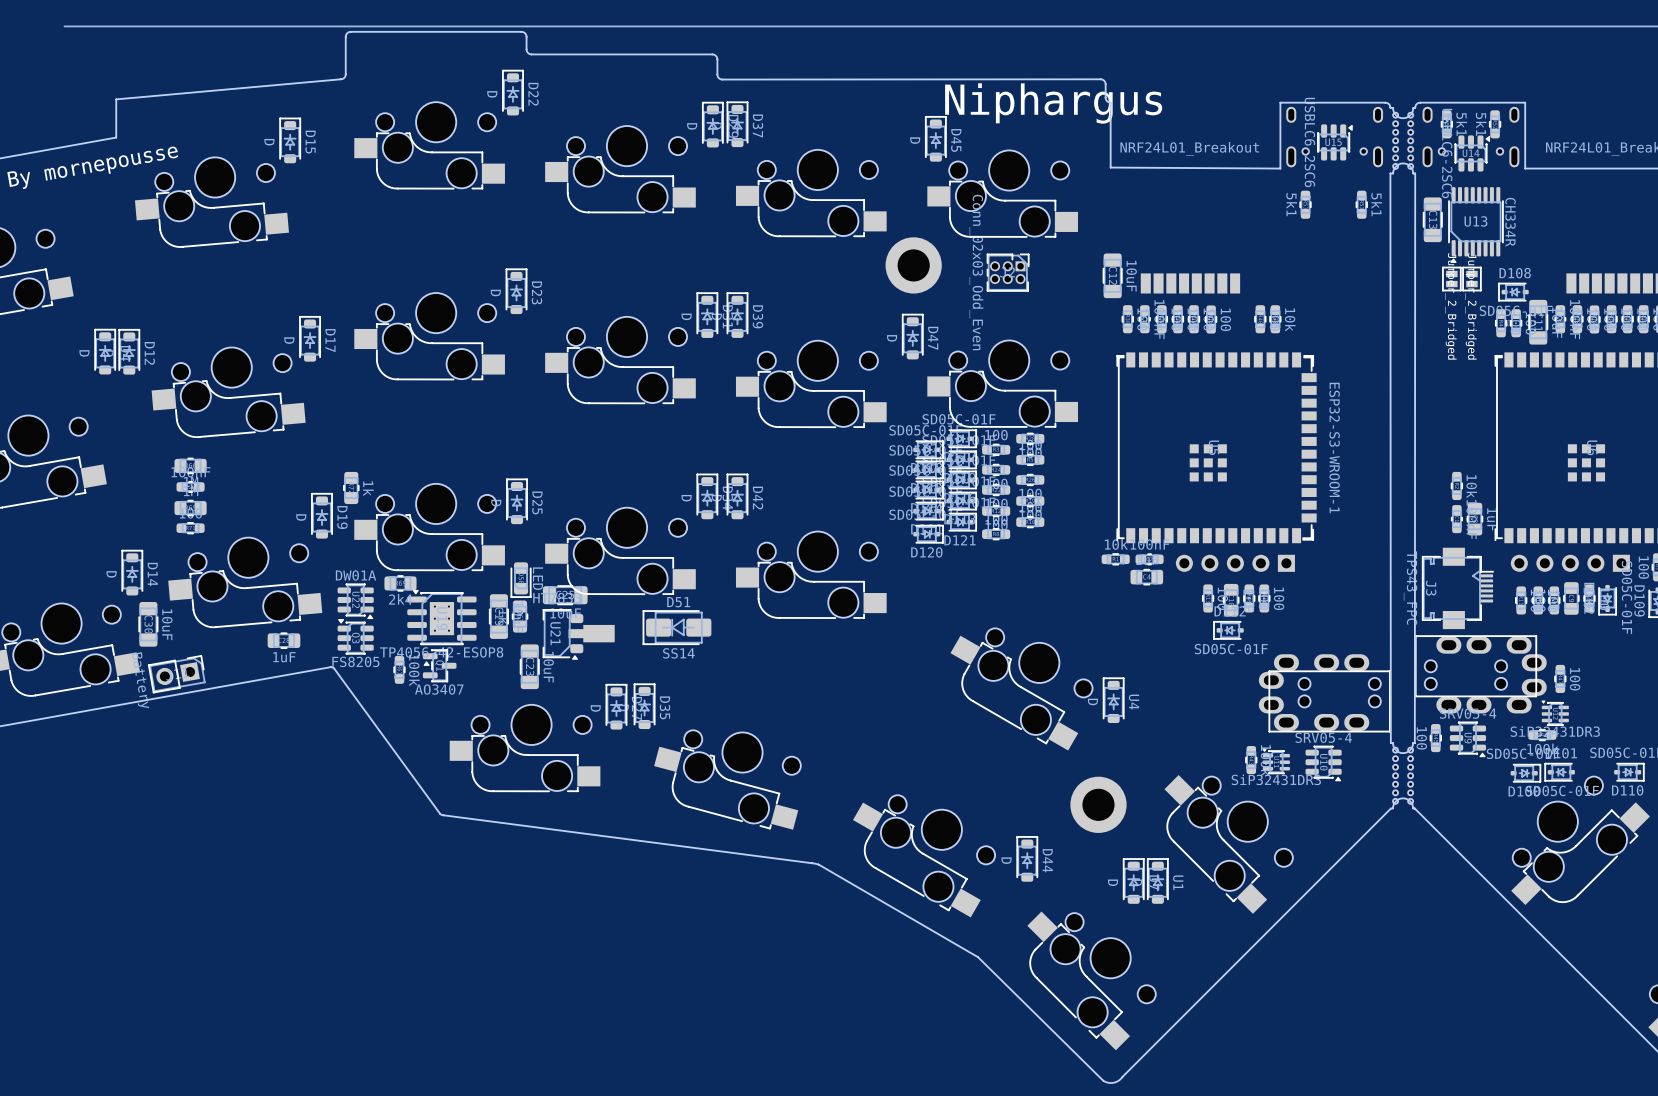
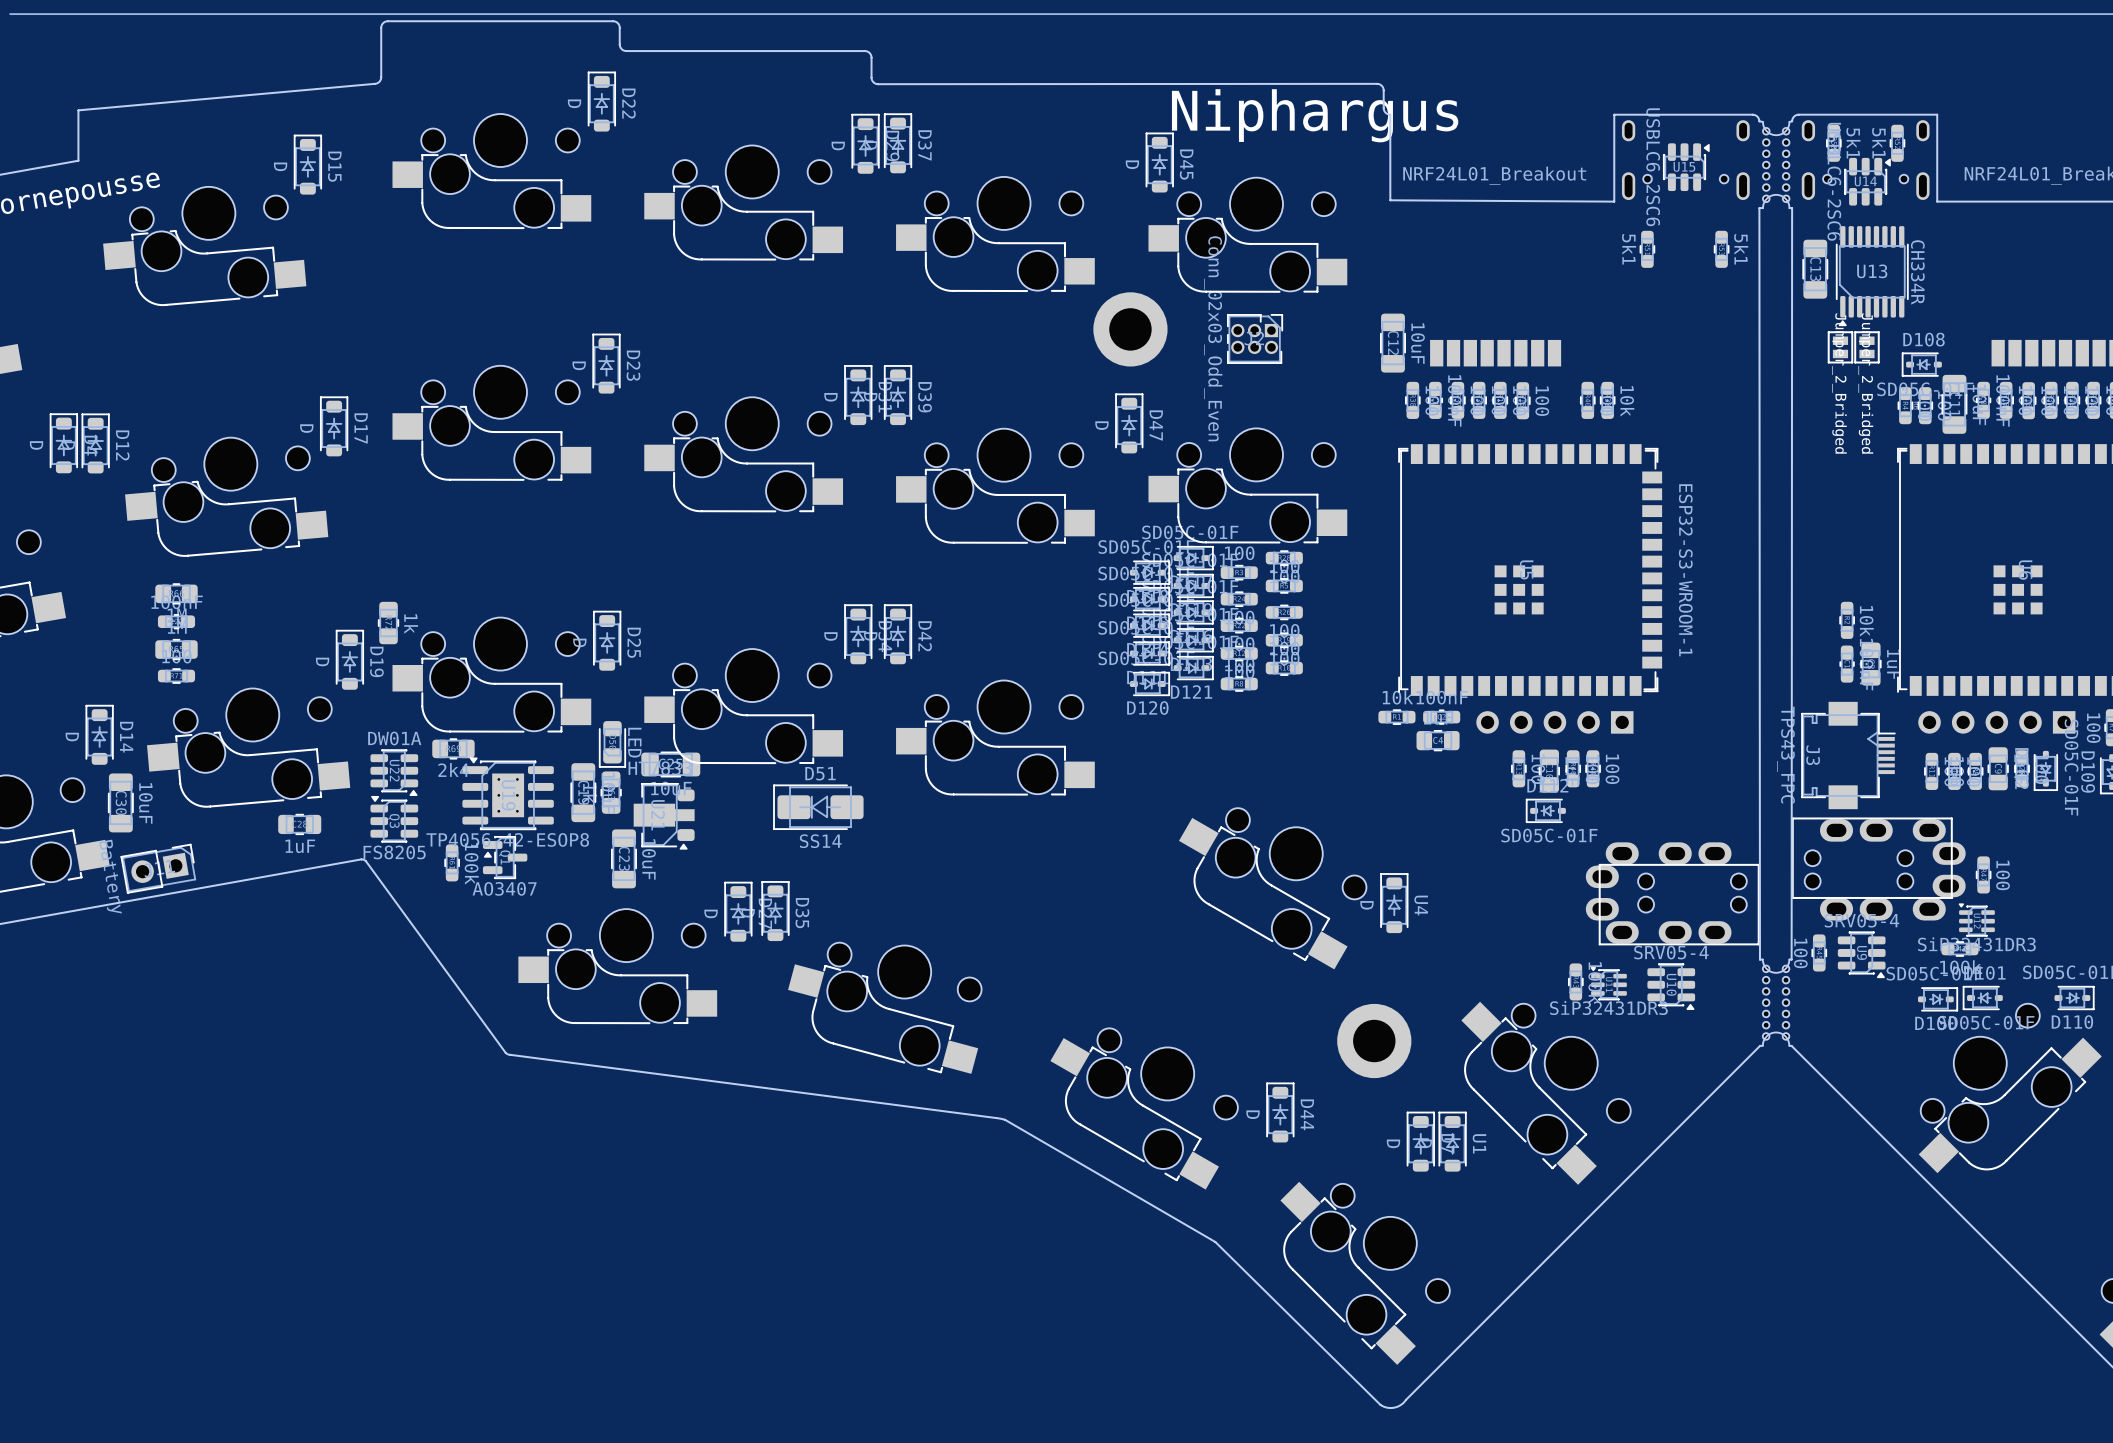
U21 footprint: [542, 609, 615, 660] -> [633, 783, 695, 850]

